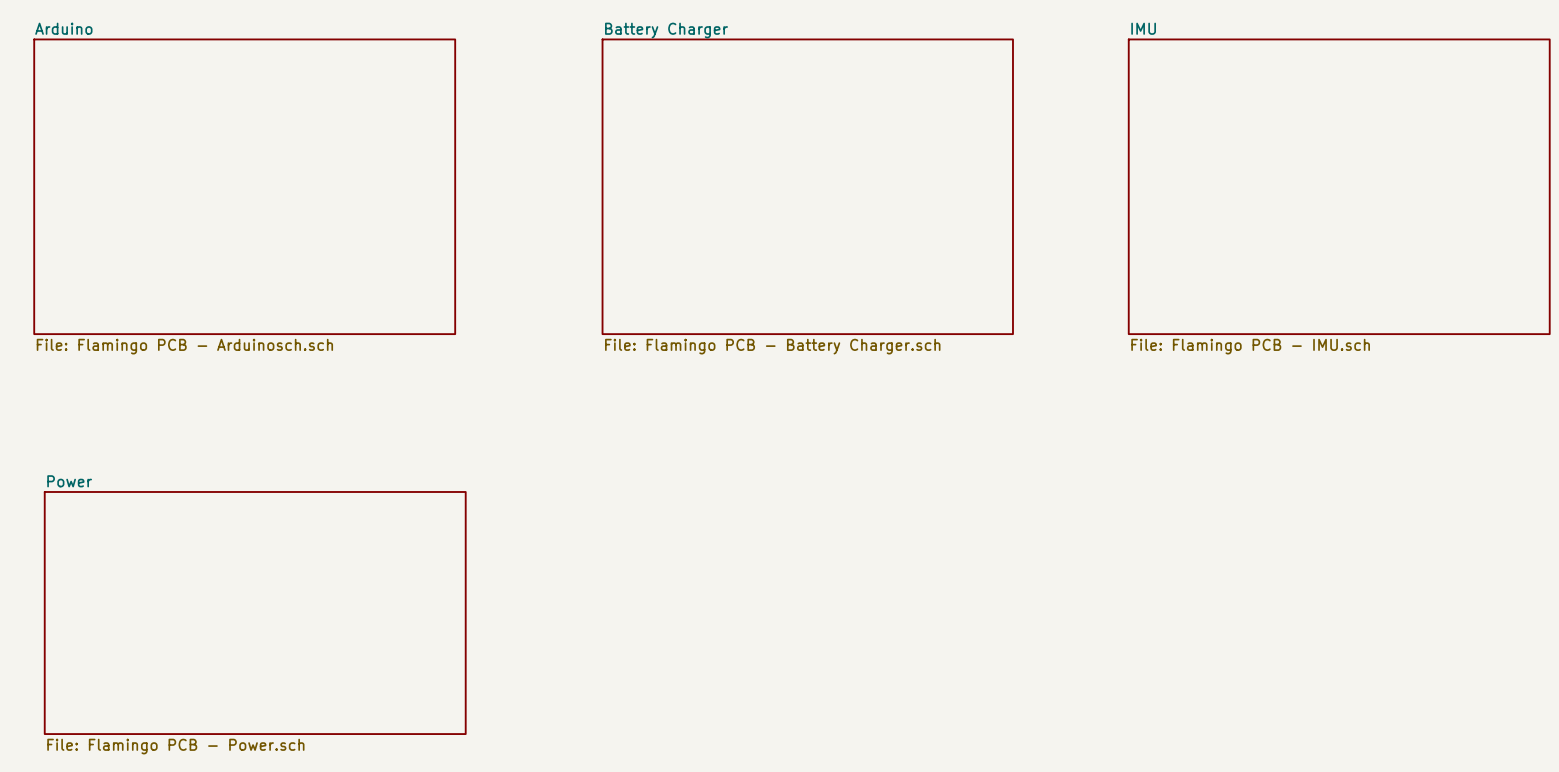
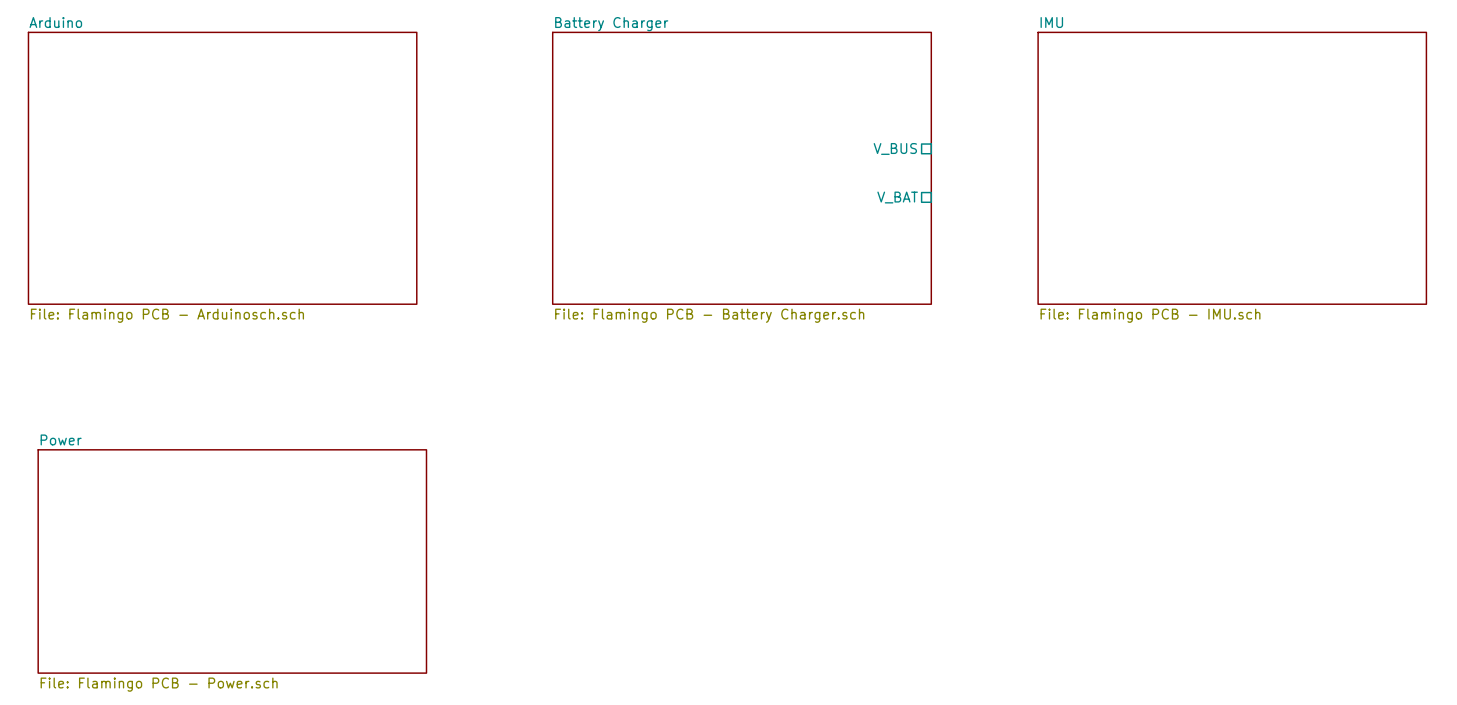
sheet pin: none -> V_BUS (895, 148)
sheet pin: none -> V_BAT (897, 197)

